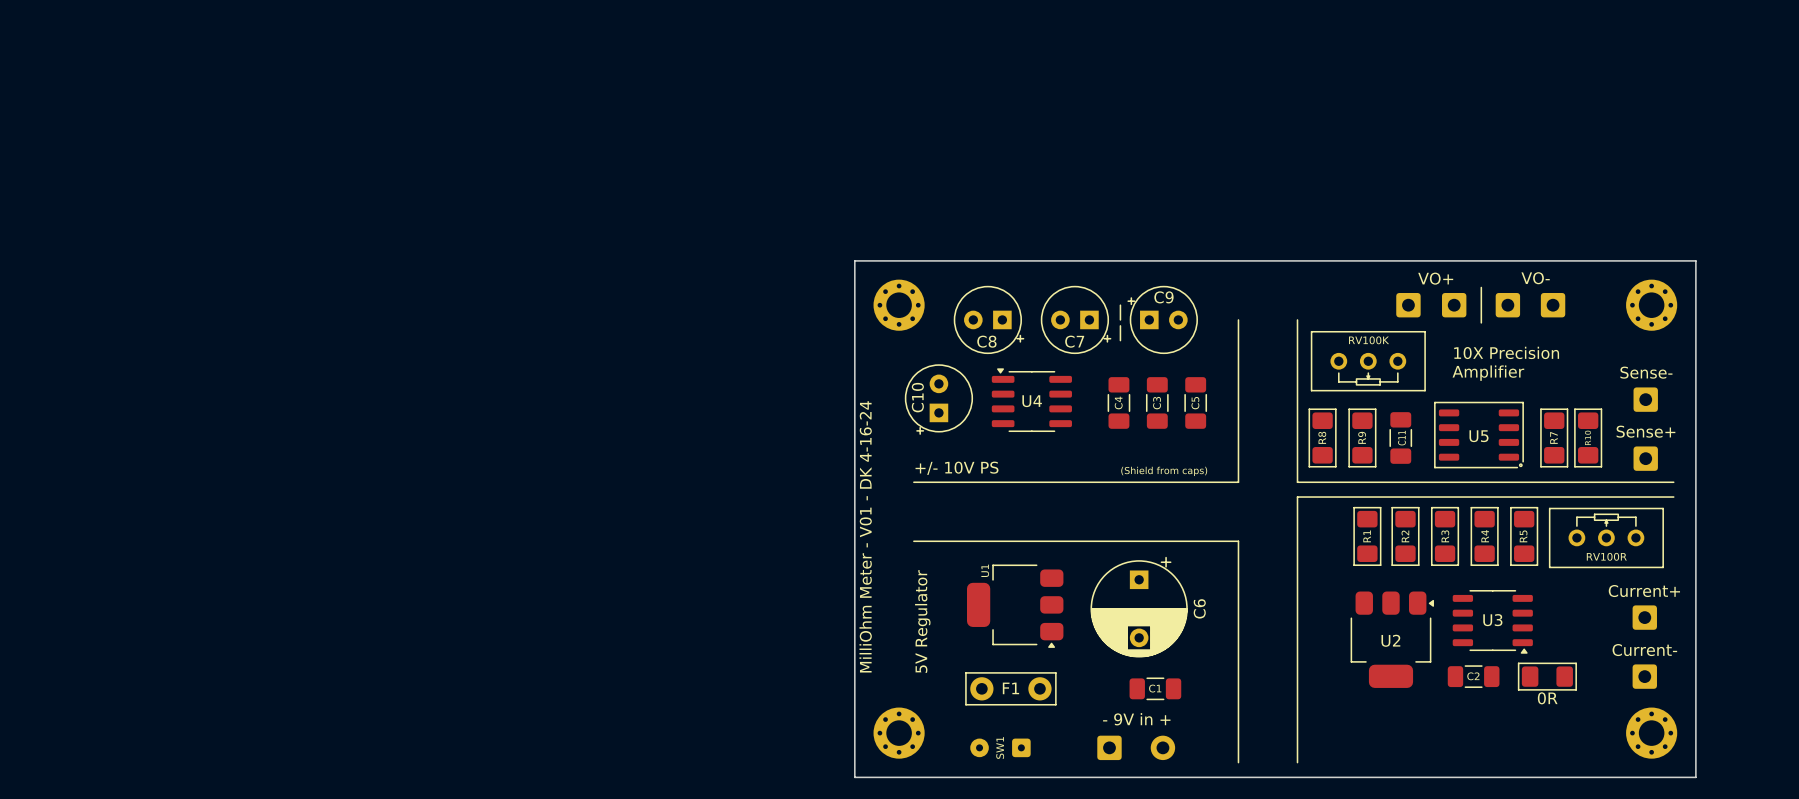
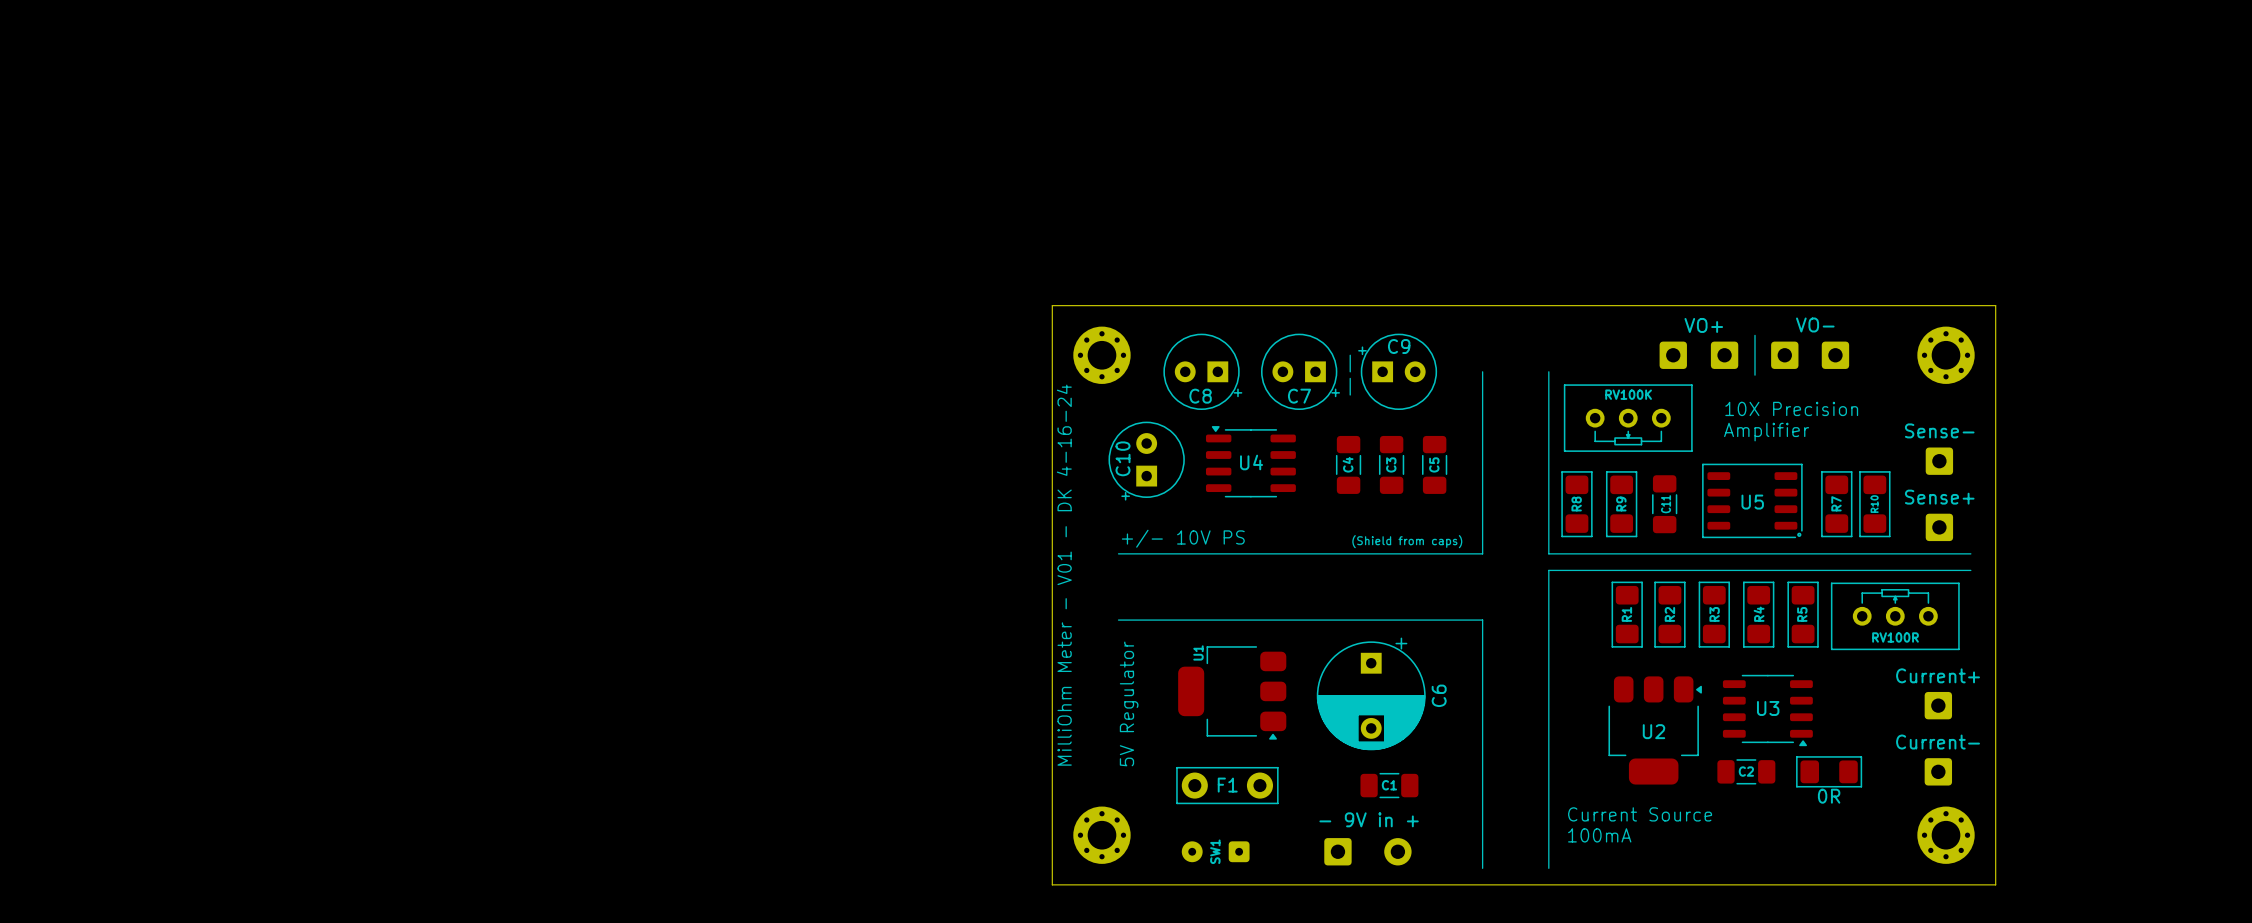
text: none -> Current Source (1640, 814)
text: none -> 100mA (1599, 835)

